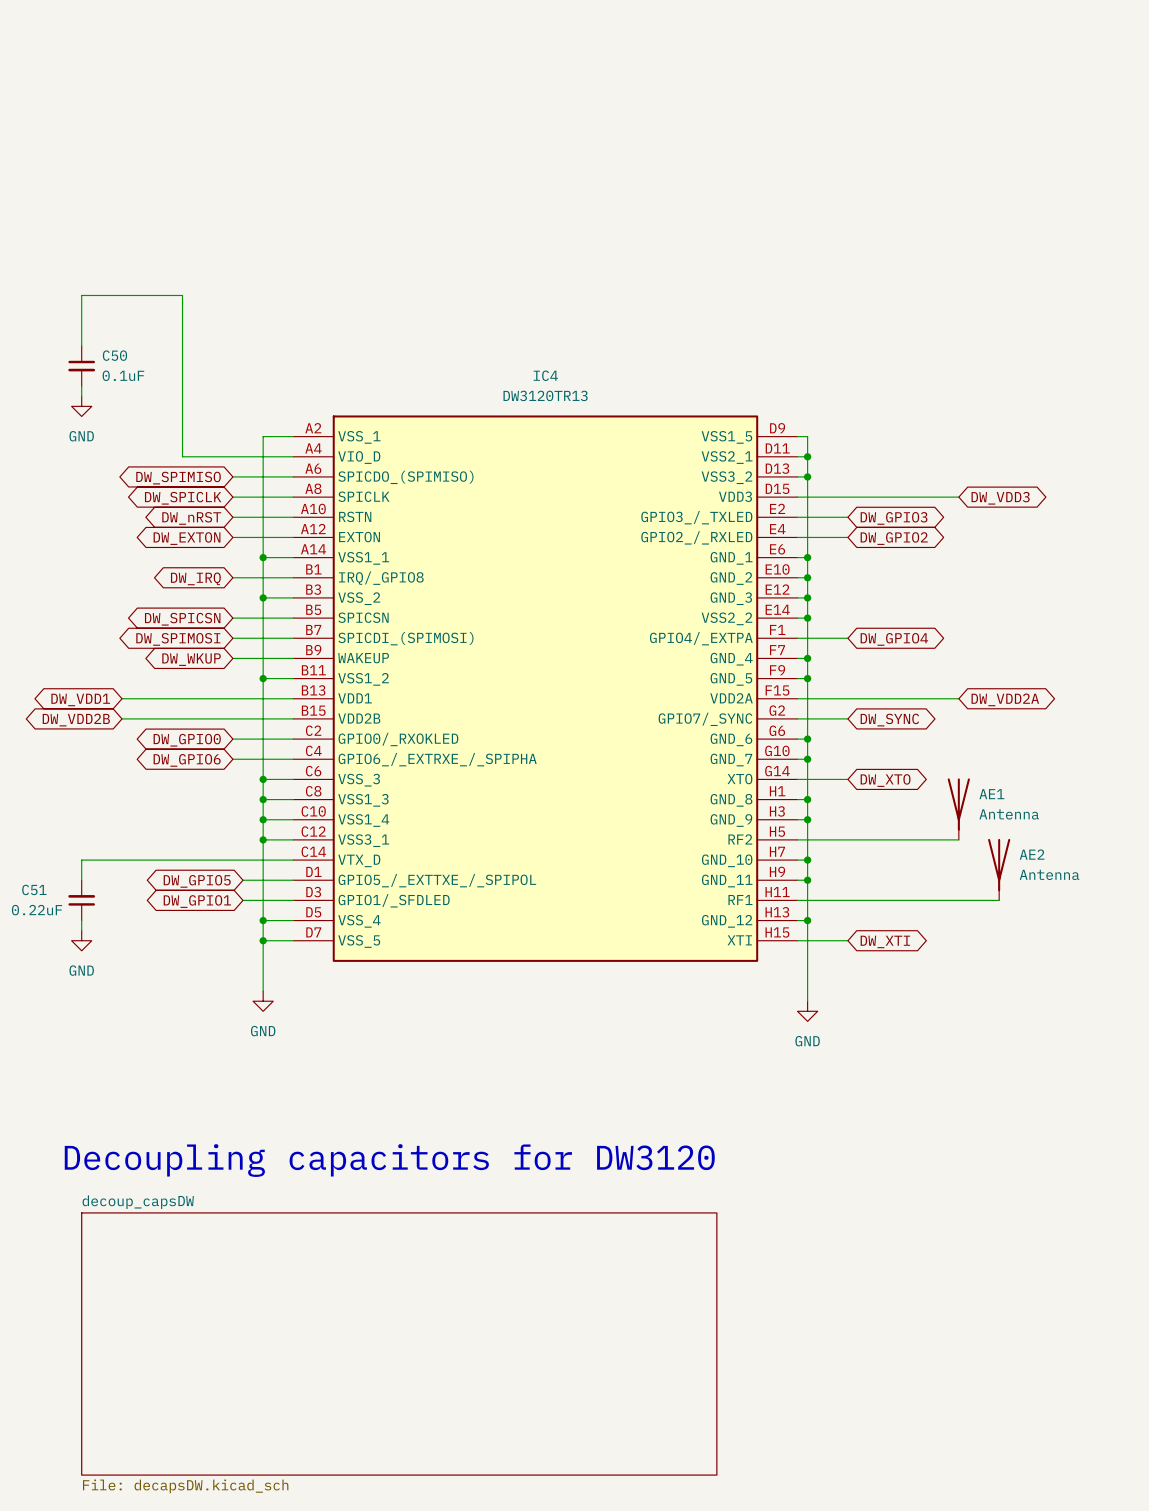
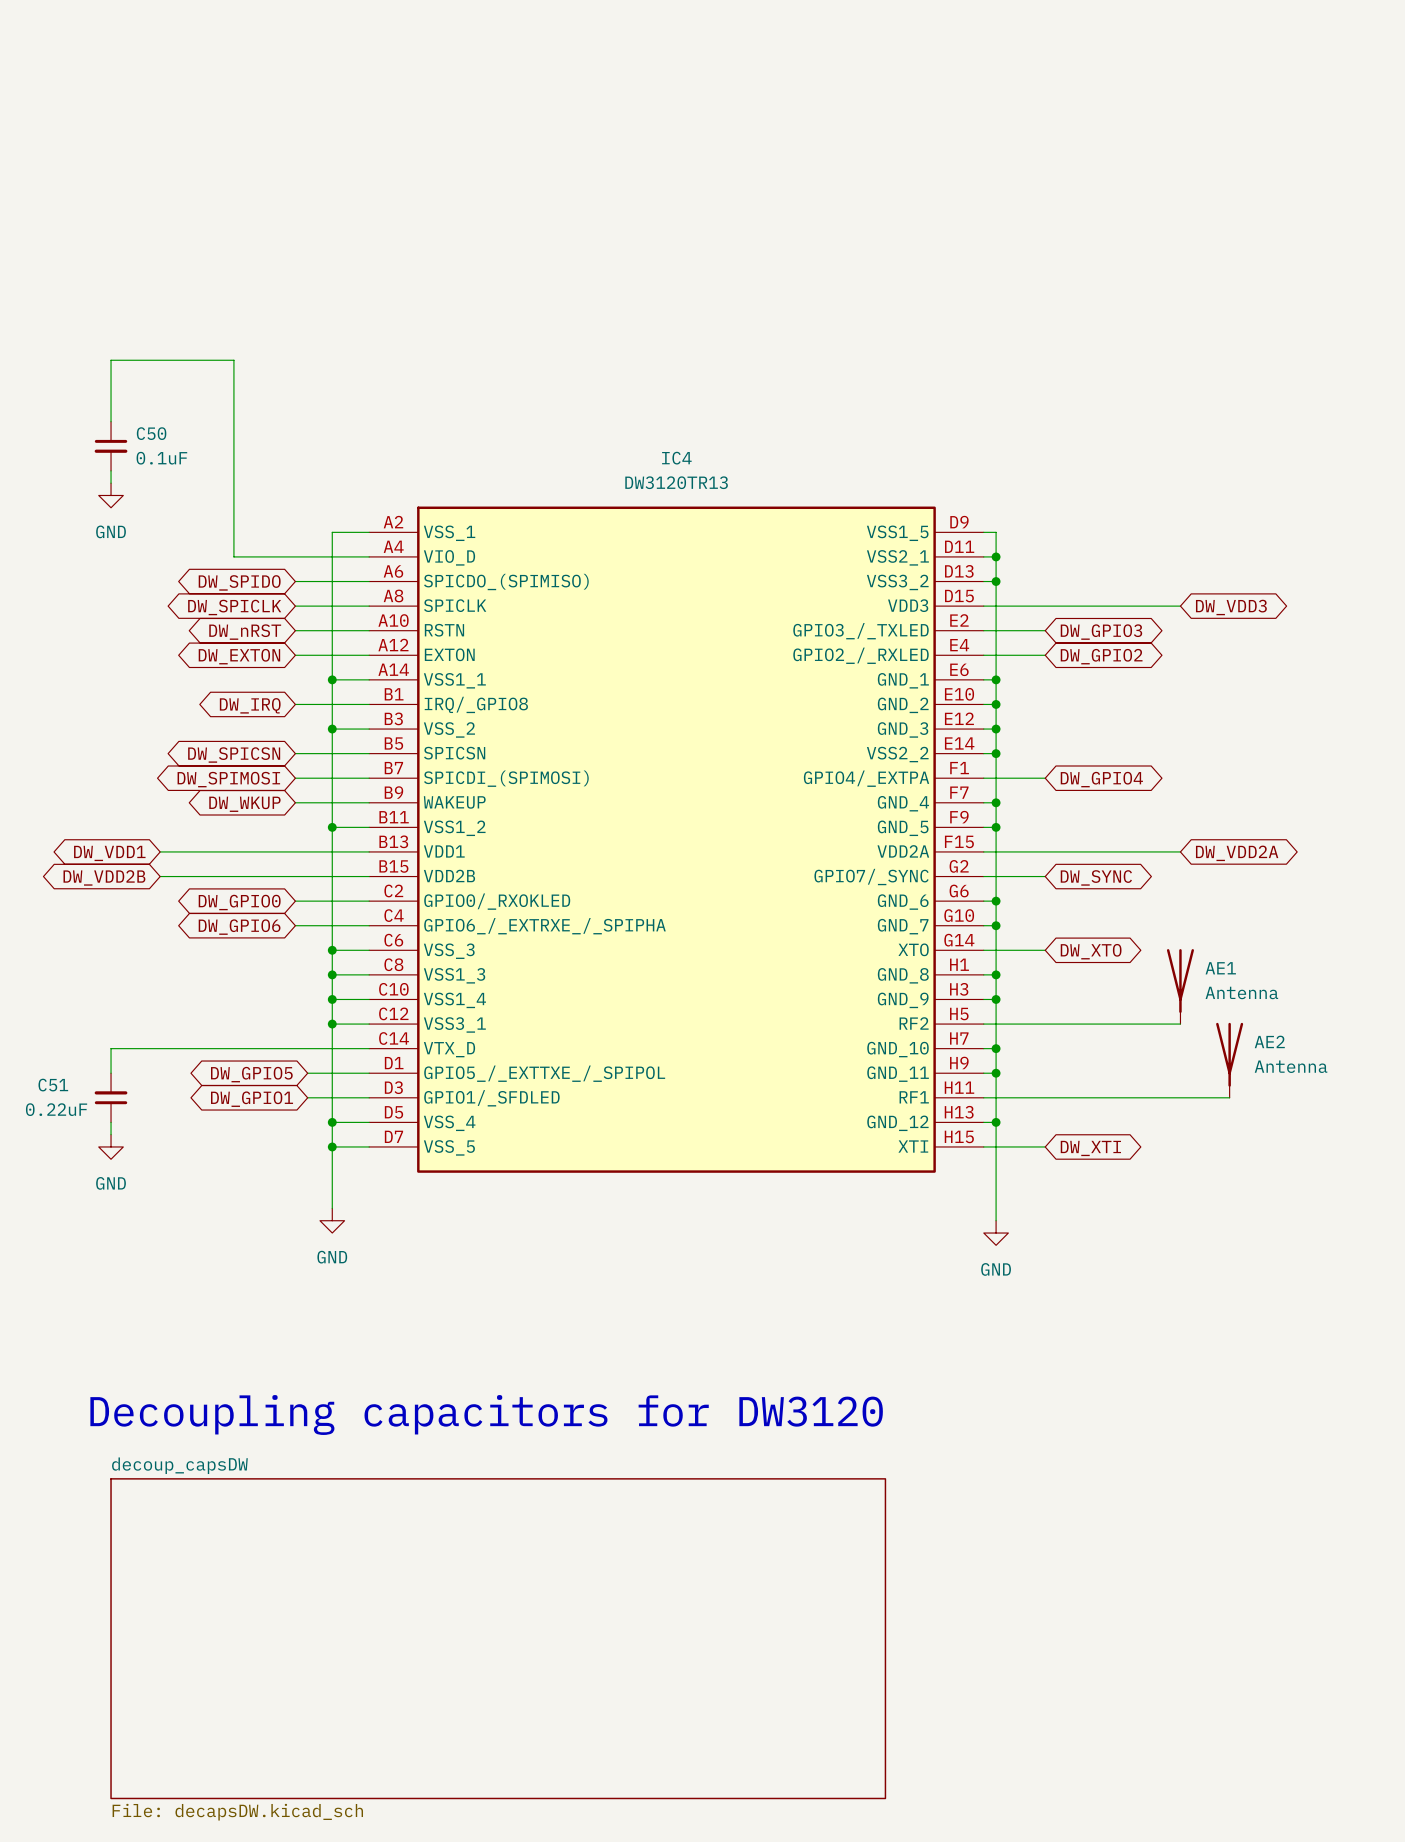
global label: DW_SPIMISO (178, 478) -> DW_SPIDO (239, 582)

